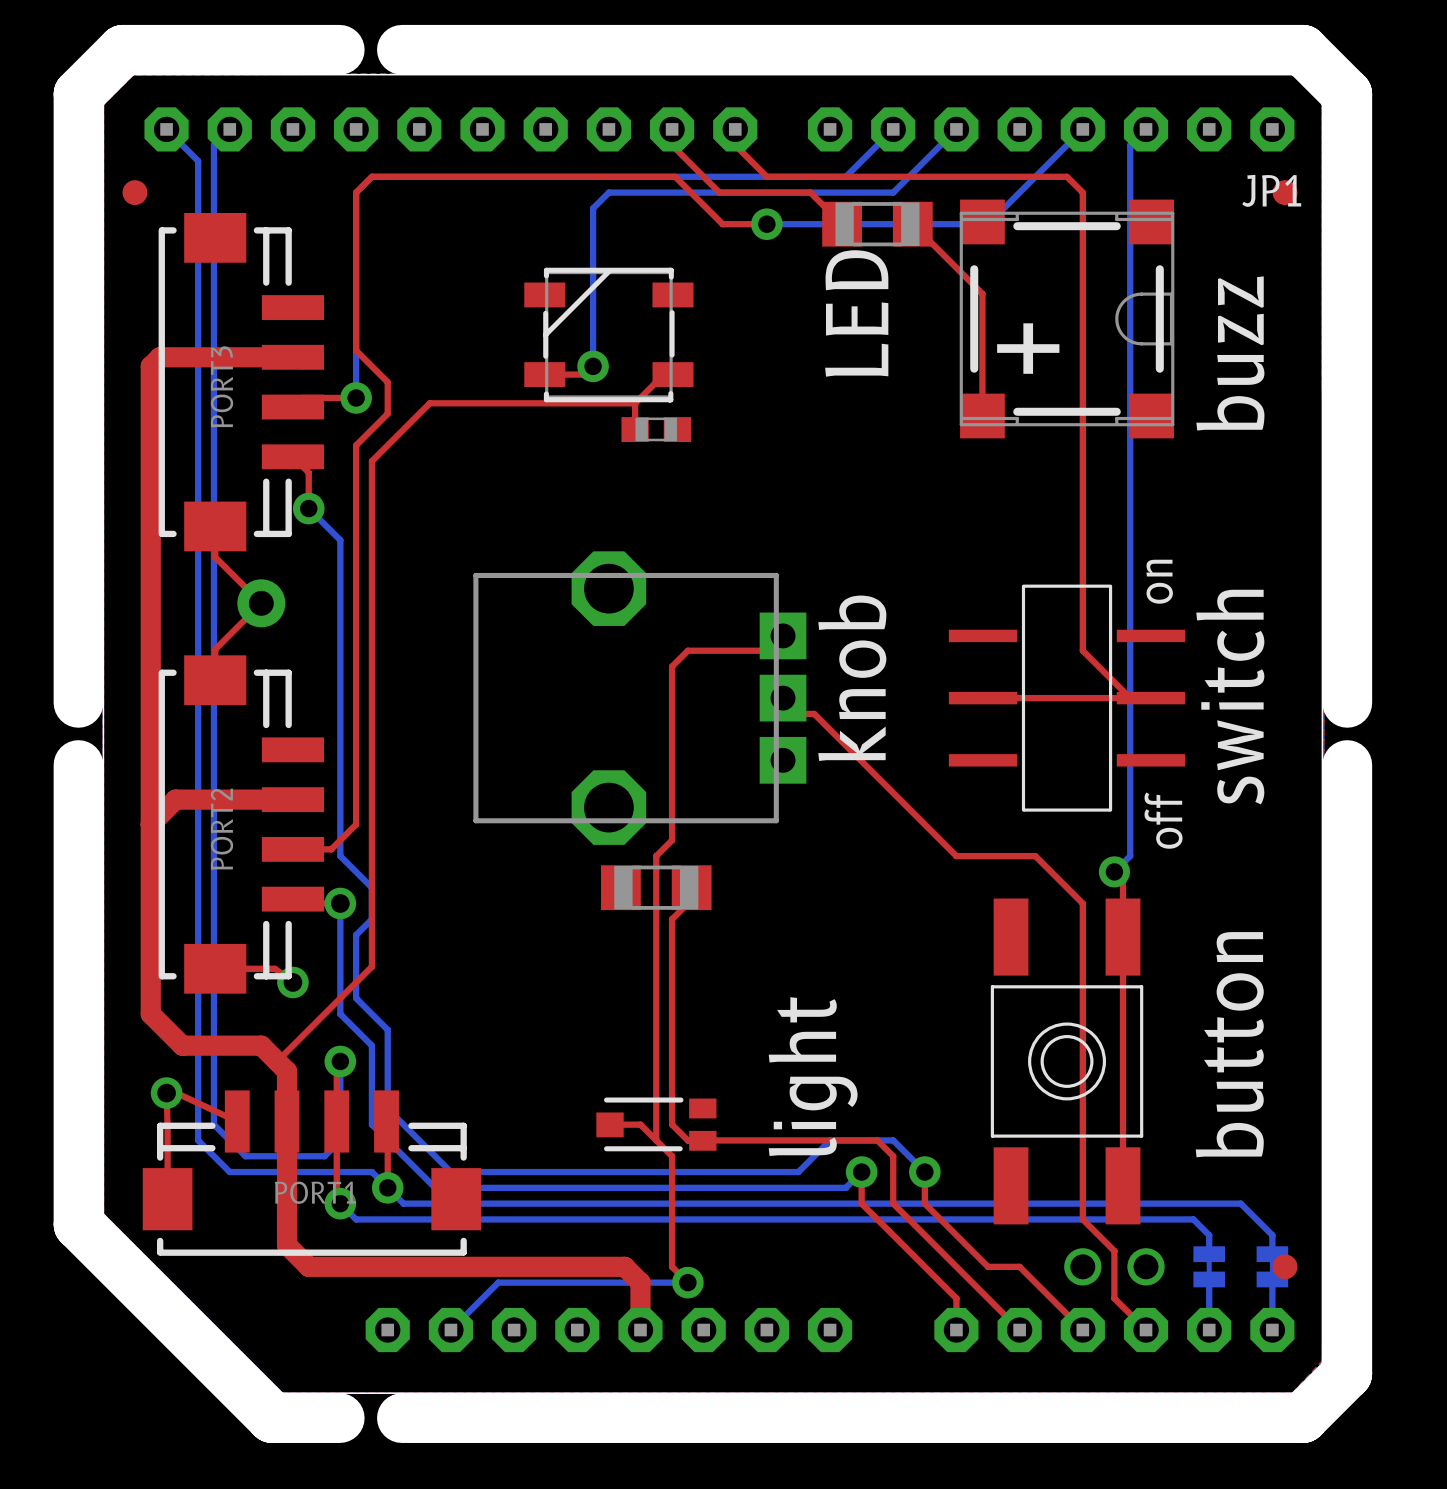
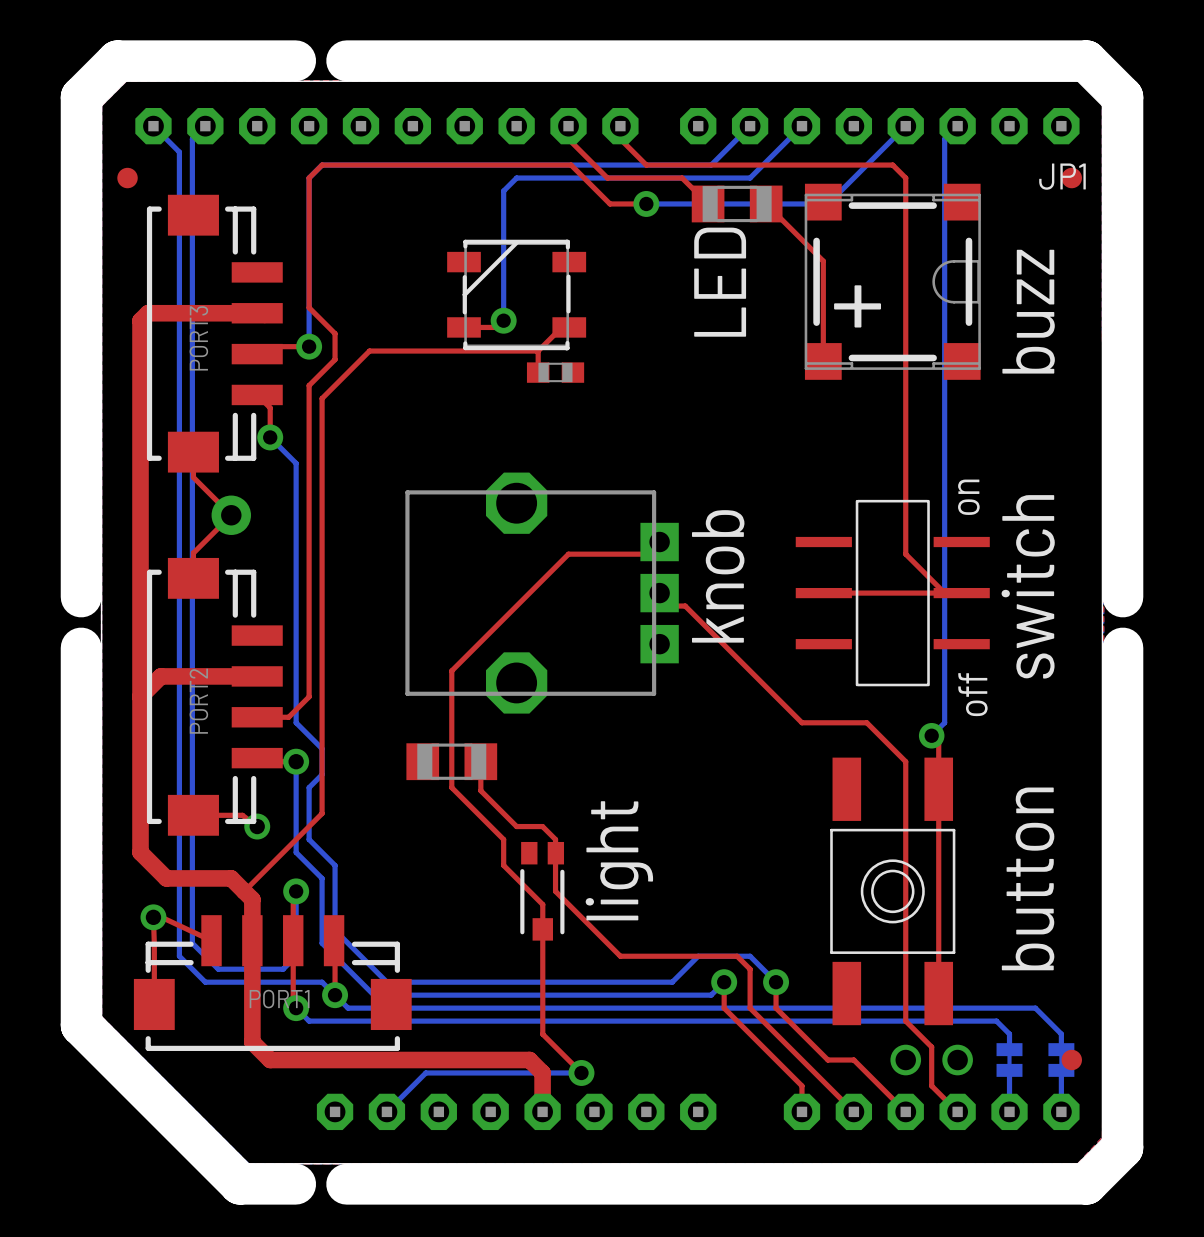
top track: (687, 650) (672, 666) (672, 840) (656, 856) (656, 998) -> (581, 554) (568, 554) (451, 670) (451, 787) (503, 839) (503, 865) (542, 904) (542, 1034) (568, 1060)
part position: (656, 887) -> (451, 761)
top track: (691, 887) (691, 899) (672, 919) (672, 1124) (688, 1140) (735, 1140) -> none
top track: none -> (480, 761) (480, 790) (516, 826) (542, 826) (555, 839)
top track: (656, 1061) (656, 1140) -> (555, 891) (620, 956)
text position: light (813, 1076) -> light (619, 860)
top track: (610, 1124) (640, 1124) (672, 1156) (672, 1266) -> none
part rotation: 0° (656, 1124) -> 90° counterclockwise (542, 891)

